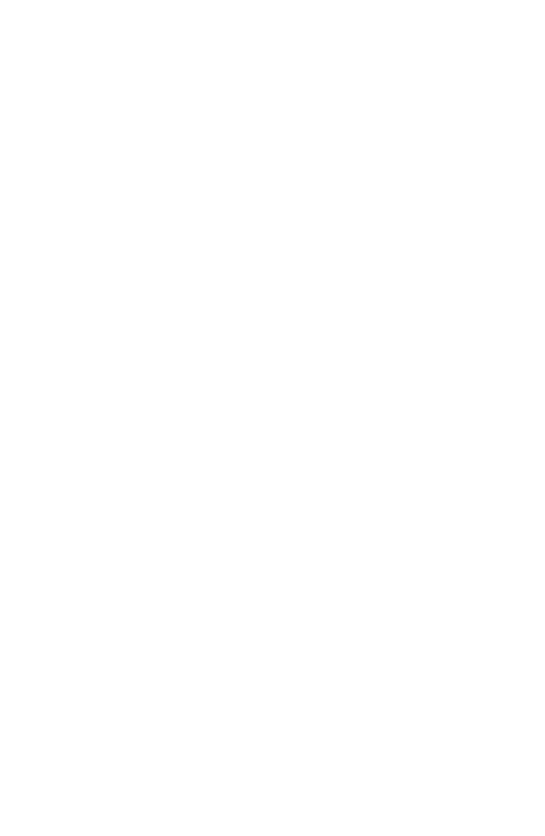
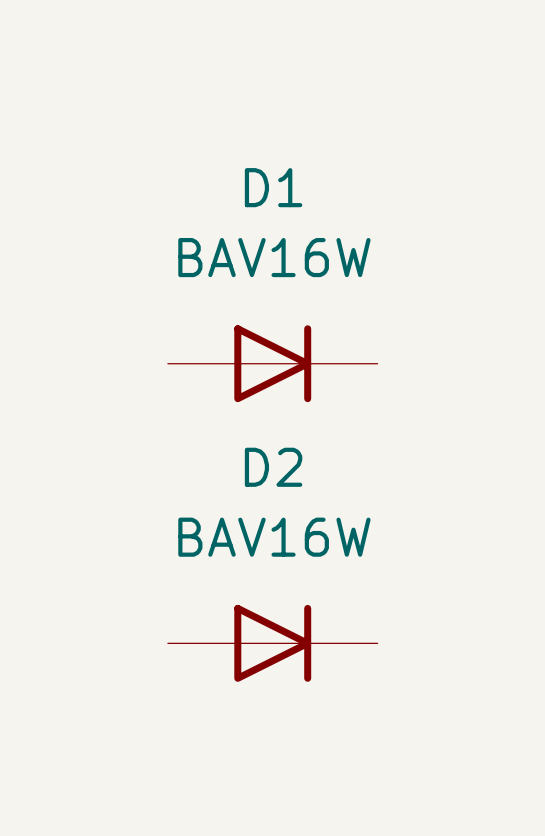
D1: none -> BAV16W (272, 363)
D2: none -> BAV16W (272, 643)

